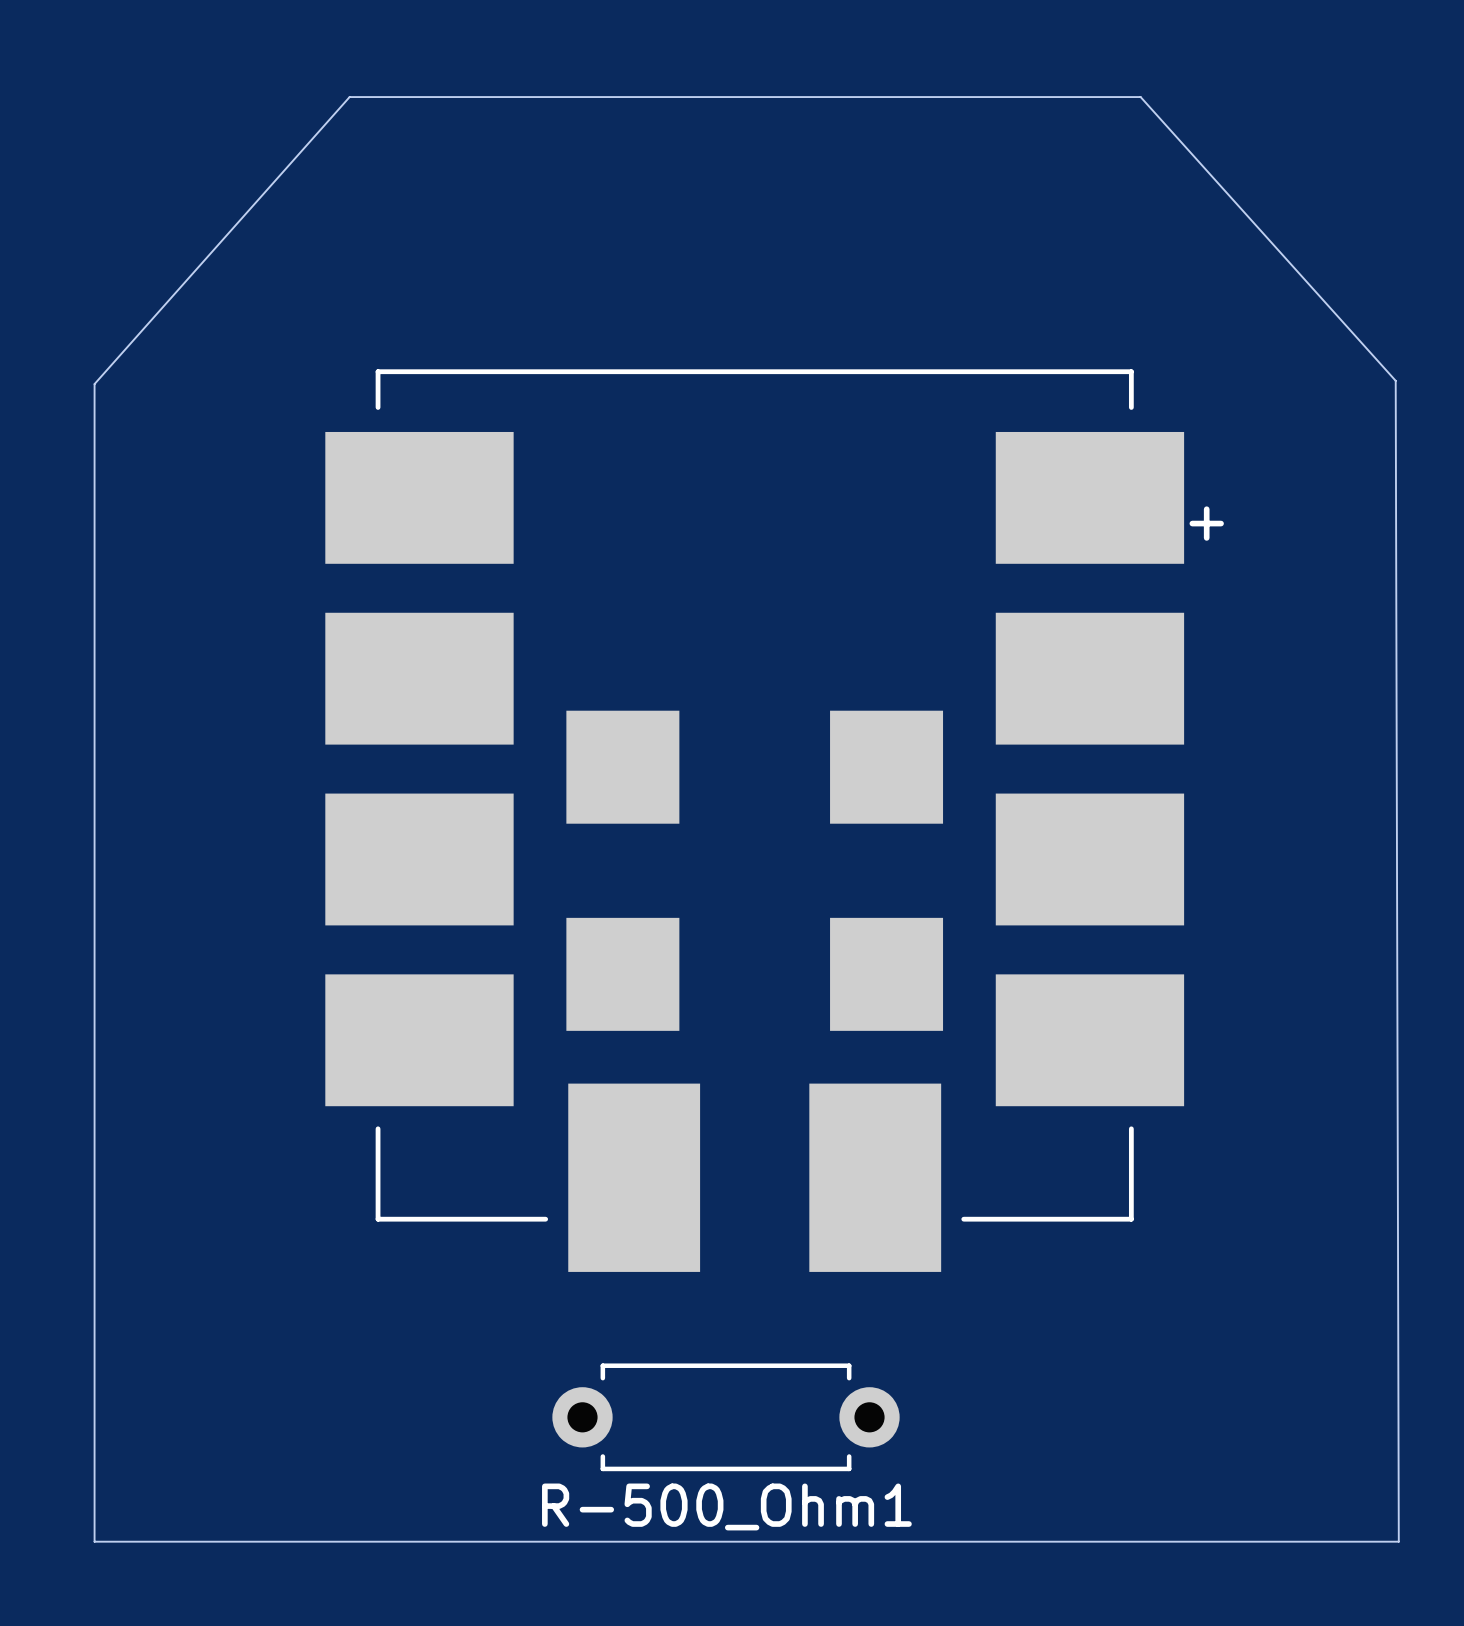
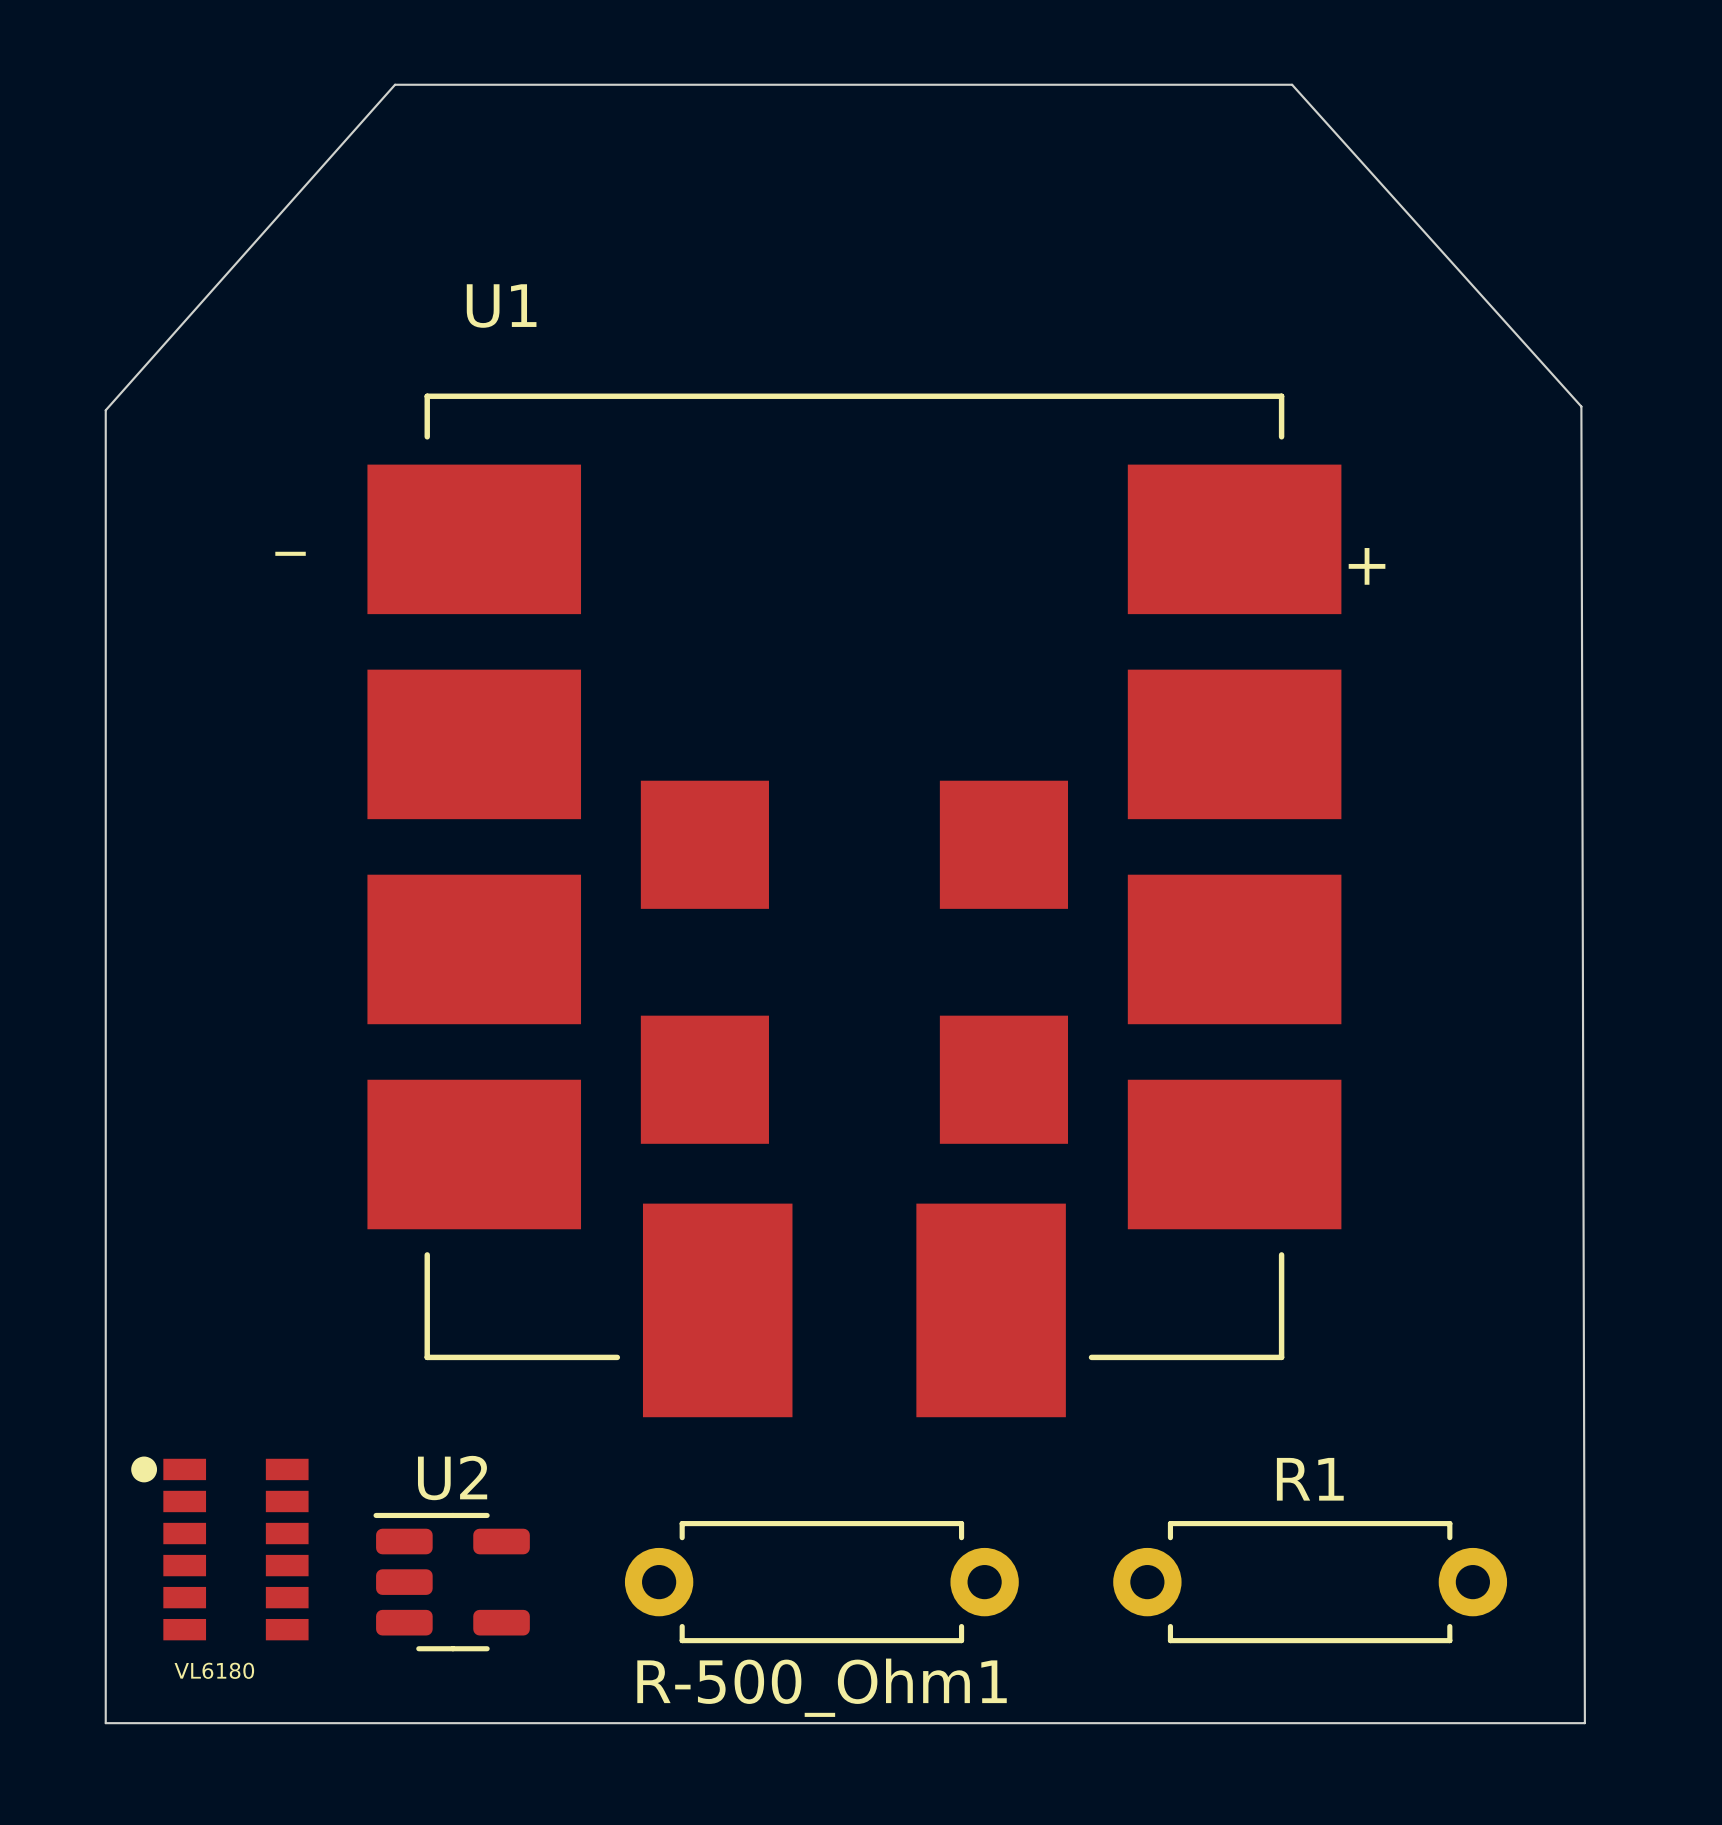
U1 name: none -> U1 (501, 306)
U1 text: none -> _ (290, 553)
part: none -> VL6180 (219, 1548)
U2: none -> (451, 1582)
R1: none -> (1310, 1582)

